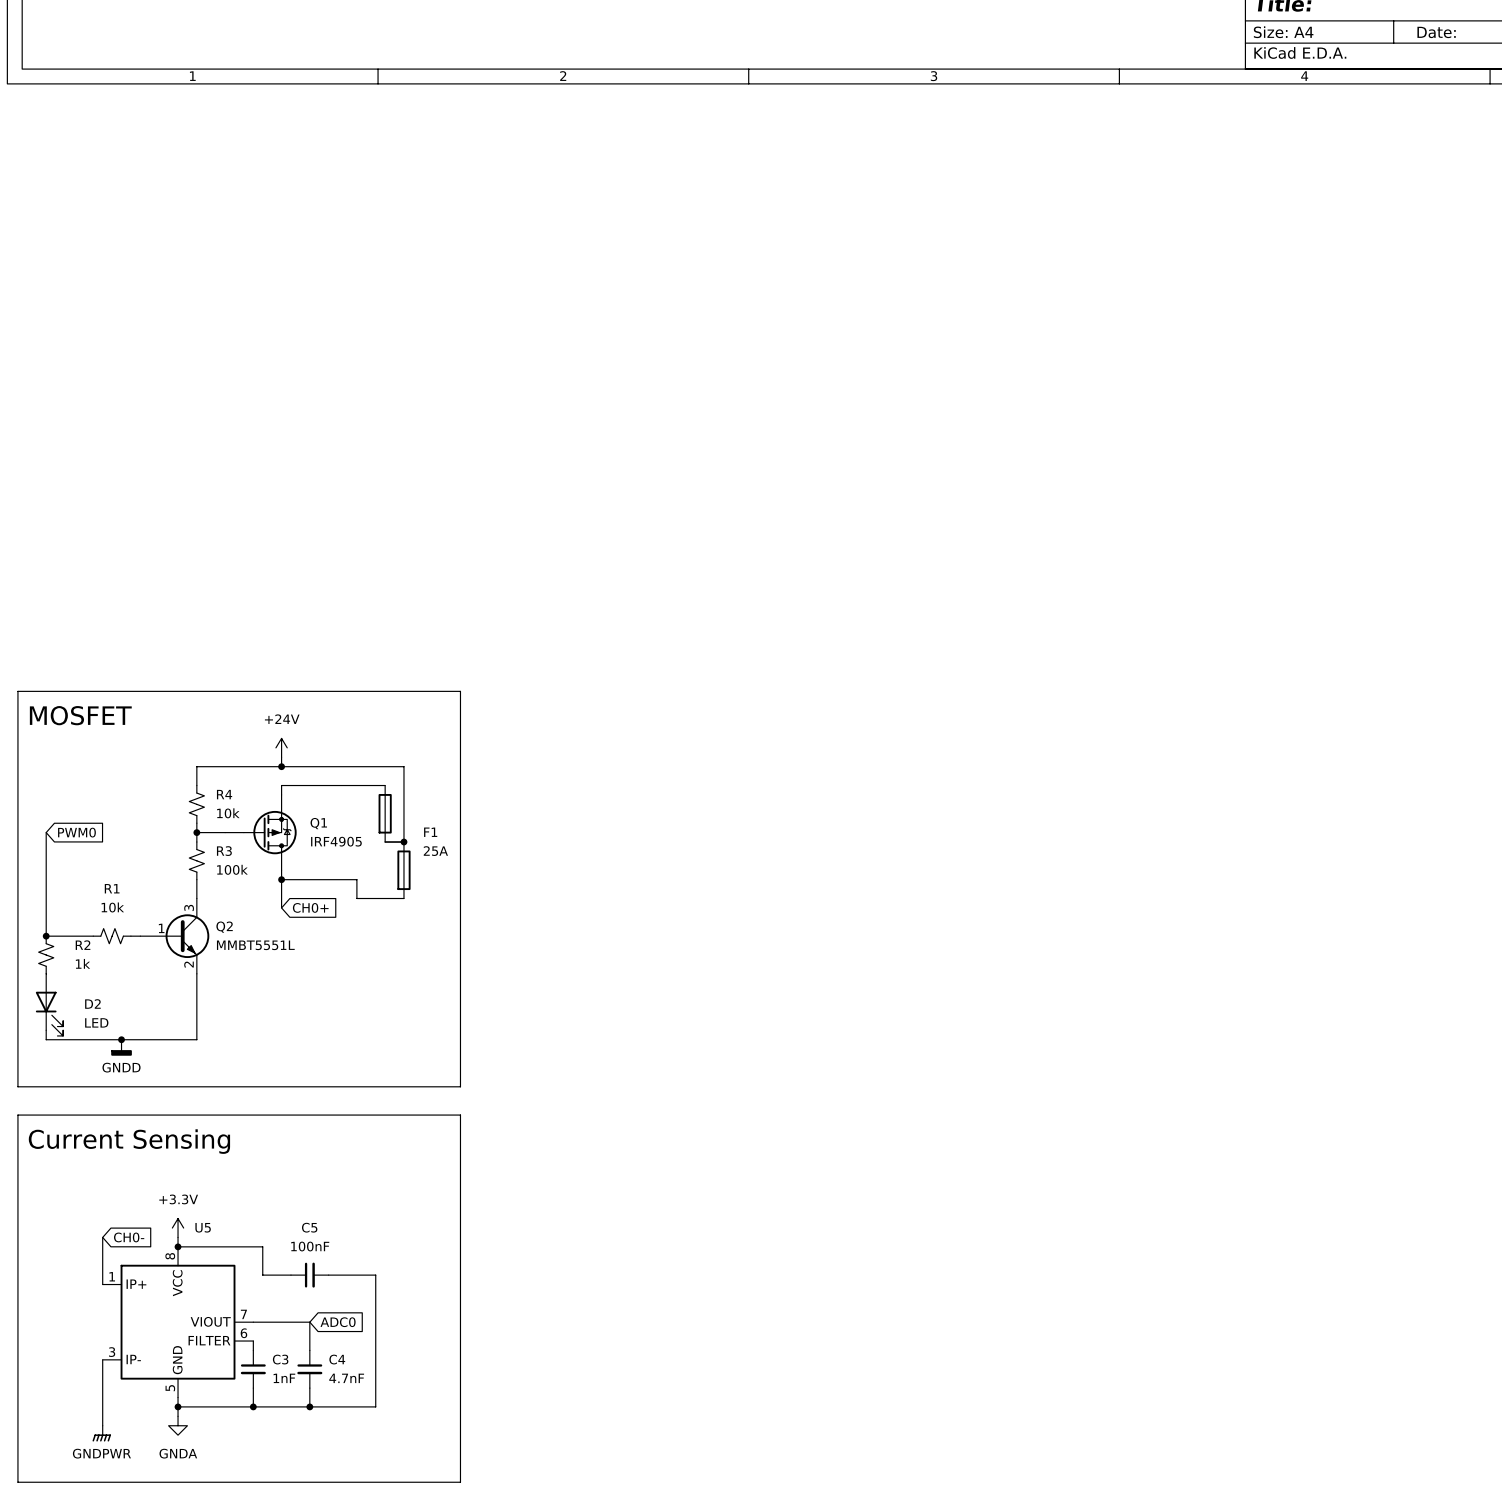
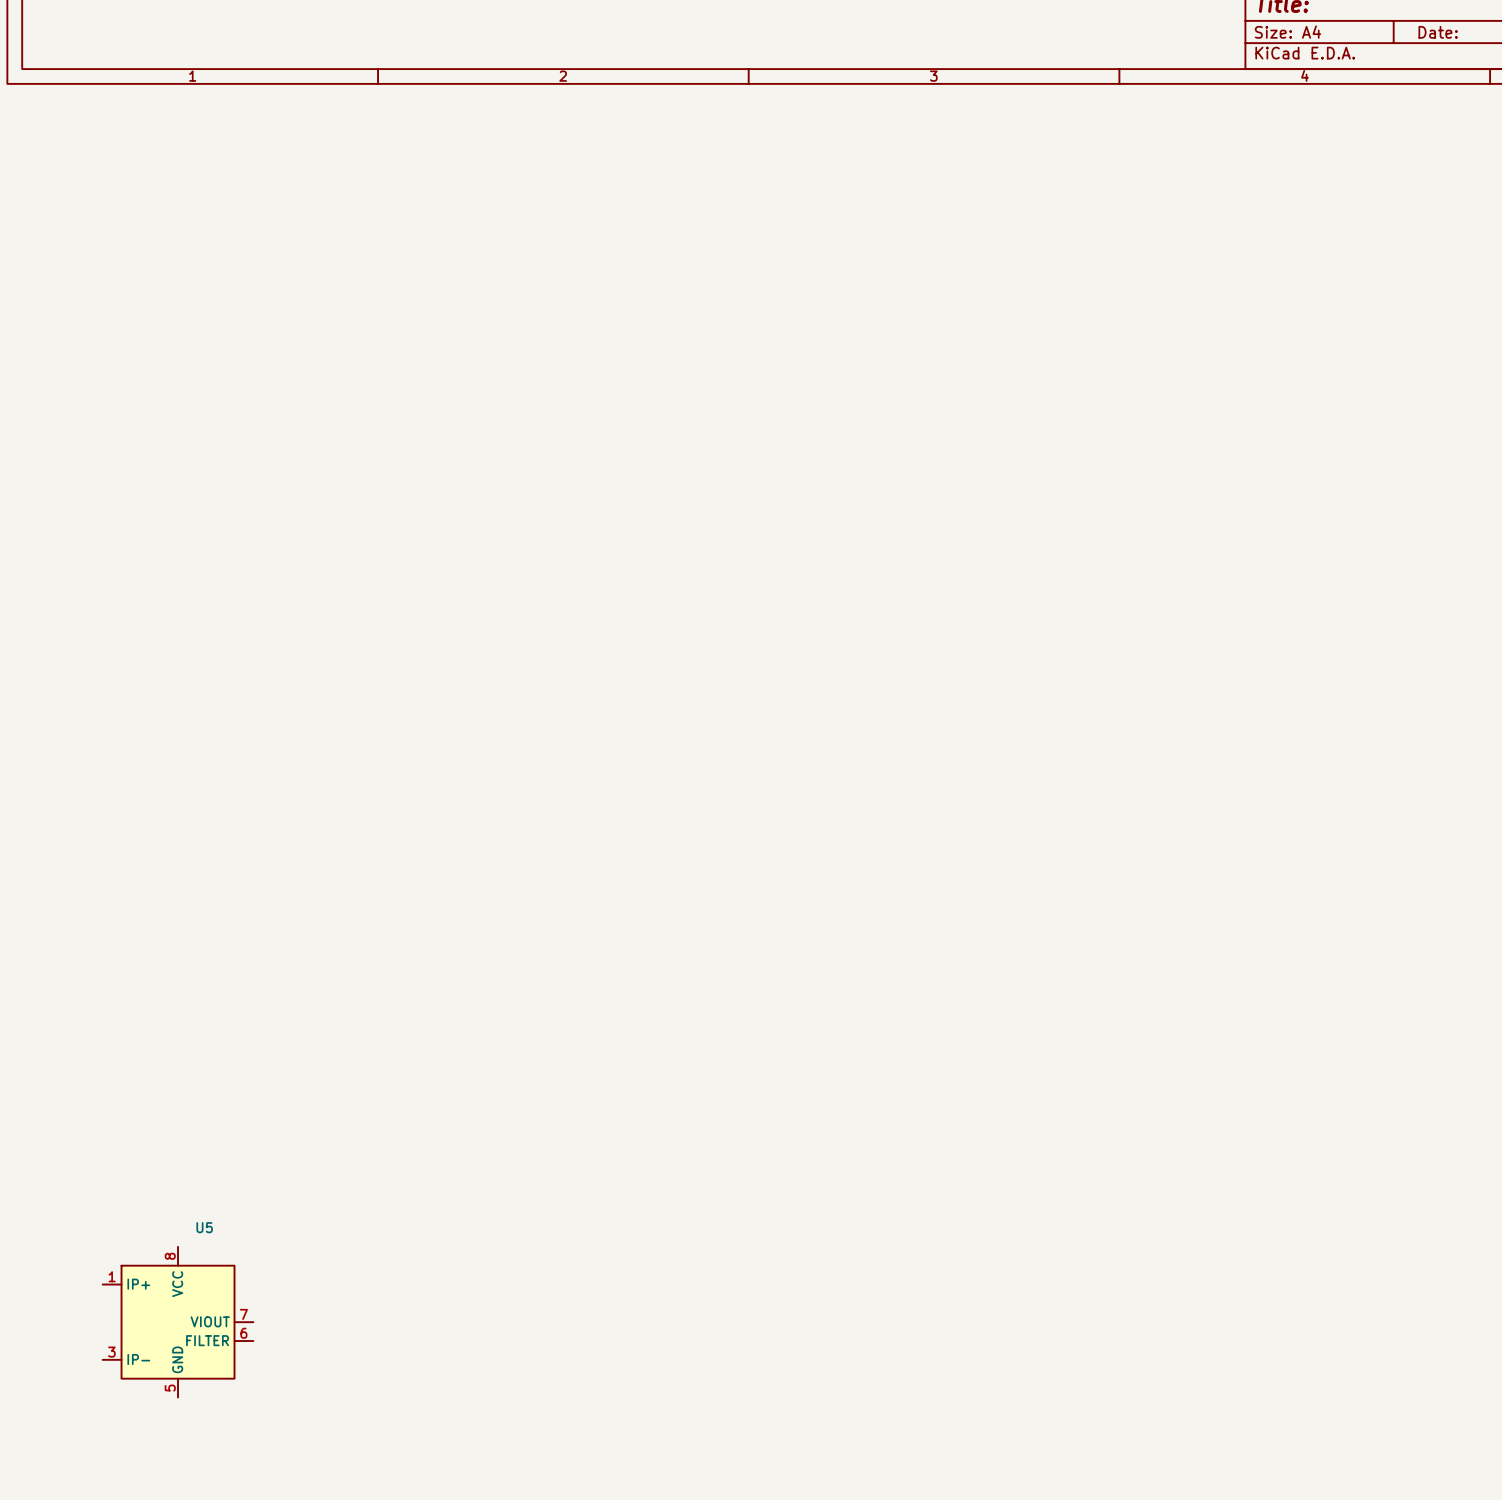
line: (17, 691) (17, 1086) (460, 1086) (460, 691) (17, 691) -> none
text: MOSFET (80, 715) -> none
power symbol: +24V (281, 747) -> none
wire: (281, 757) (281, 766) -> none
junction: (281, 766) -> none
wire: (196, 785) (196, 766) (403, 766) (403, 842) (385, 842) -> none
wire: (385, 785) (281, 785) (281, 794) -> none
R4: 10k (196, 804) -> none
wire: (196, 823) (196, 842) -> none
wire: (46, 832) (46, 936) (93, 936) -> none
global label: PWM0 (76, 832) -> none
wire: (196, 832) (225, 832) -> none
junction: (196, 832) -> none
Q1: IRF4905 (260, 832) -> none
F1: 25A (394, 842) -> none
junction: (403, 842) -> none
R3: 100k (196, 860) -> none
wire: (281, 870) (281, 907) -> none
wire: (196, 879) (196, 898) -> none
wire: (281, 879) (356, 879) (356, 898) (403, 898) -> none
junction: (281, 879) -> none
global label: CH0+ (310, 907) -> none
junction: (46, 936) -> none
R1: 10k (112, 936) -> none
wire: (130, 936) (140, 936) -> none
Q2: MMBT5551L (174, 936) -> none
R2: 1k (46, 954) -> none
wire: (196, 973) (196, 1039) (46, 1039) (46, 1030) -> none
D2: LED (49, 1004) -> none
junction: (121, 1039) -> none
power symbol: GNDD (121, 1047) -> none
line: (17, 1115) (460, 1115) (460, 1482) (17, 1482) (17, 1115) -> none
text: Current Sensing (129, 1141) -> none
power symbol: +3.3V (178, 1228) -> none
wire: (102, 1237) (102, 1284) -> none
global label: CH0- (129, 1237) -> none
wire: (178, 1237) (178, 1246) (262, 1246) (262, 1275) (291, 1275) -> none
junction: (178, 1246) -> none
C5: 100nF (309, 1275) -> none
wire: (328, 1275) (375, 1275) (375, 1406) (178, 1406) -> none
wire: (253, 1322) (309, 1322) (309, 1350) -> none
global label: ADC0 (338, 1322) -> none
wire: (253, 1341) (253, 1350) -> none
wire: (102, 1359) (102, 1425) -> none
C3: 1nF (253, 1369) -> none
C4: 4.7nF (309, 1369) -> none
wire: (253, 1388) (253, 1406) -> none
wire: (309, 1388) (309, 1406) -> none
wire: (178, 1397) (178, 1416) -> none
junction: (178, 1406) -> none
junction: (253, 1406) -> none
junction: (309, 1406) -> none
power symbol: GNDA (178, 1425) -> none
power symbol: GNDPWR (101, 1433) -> none

